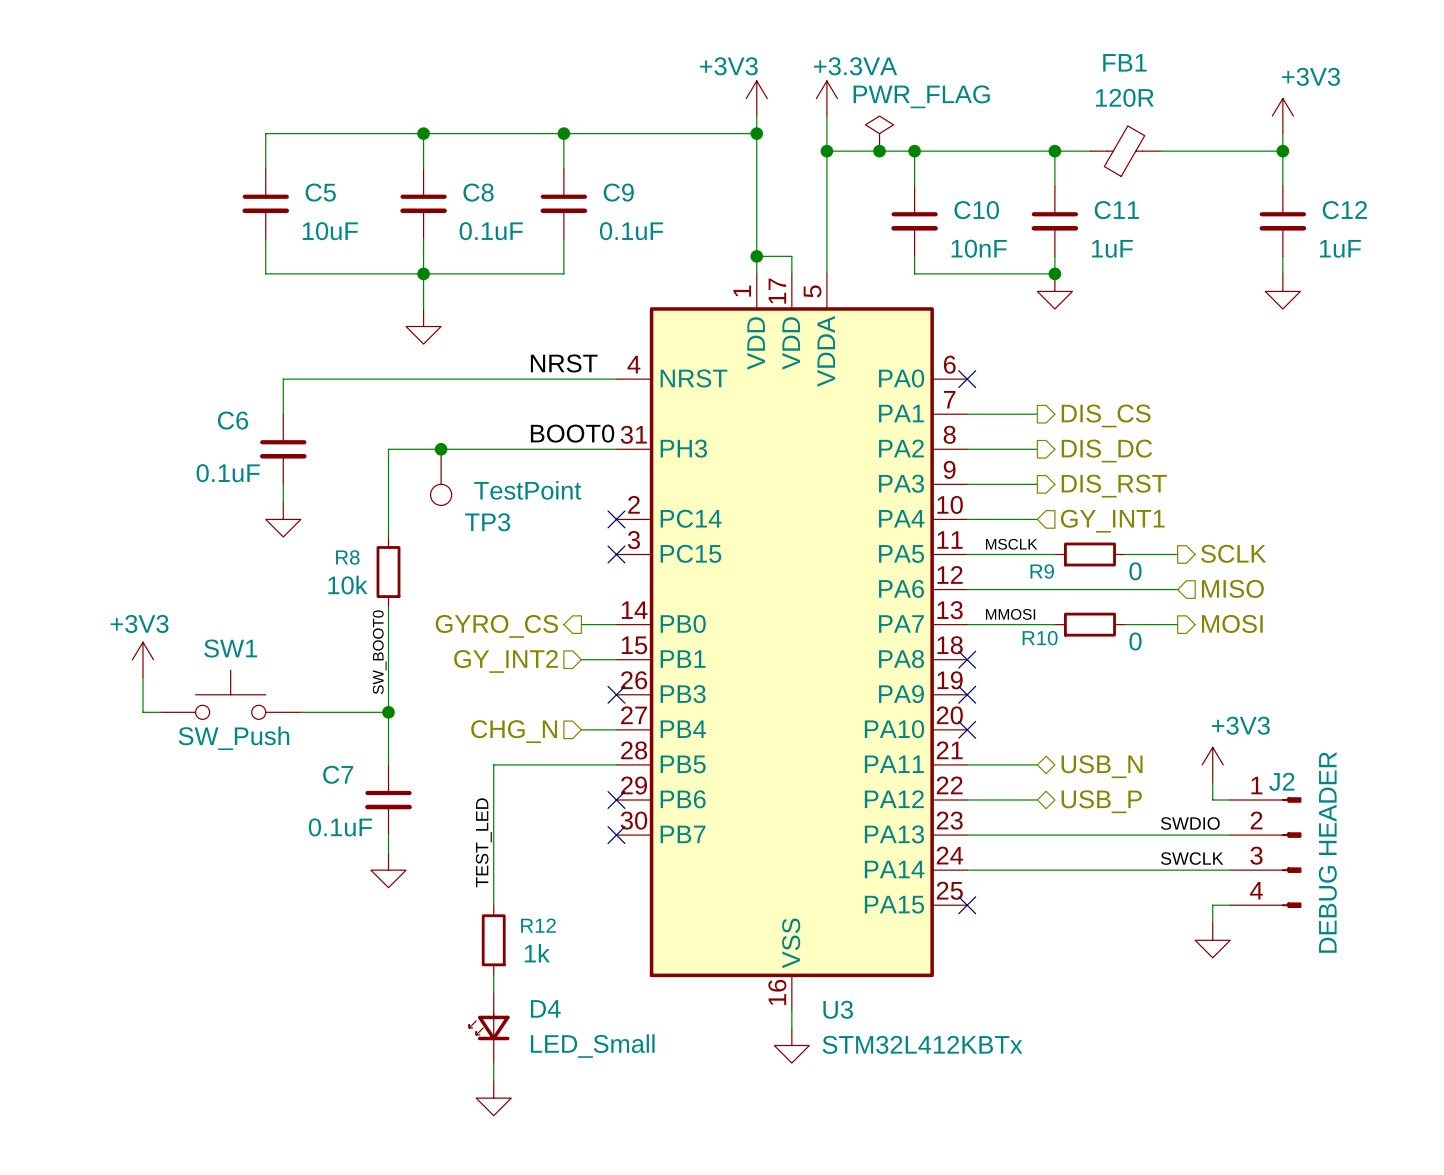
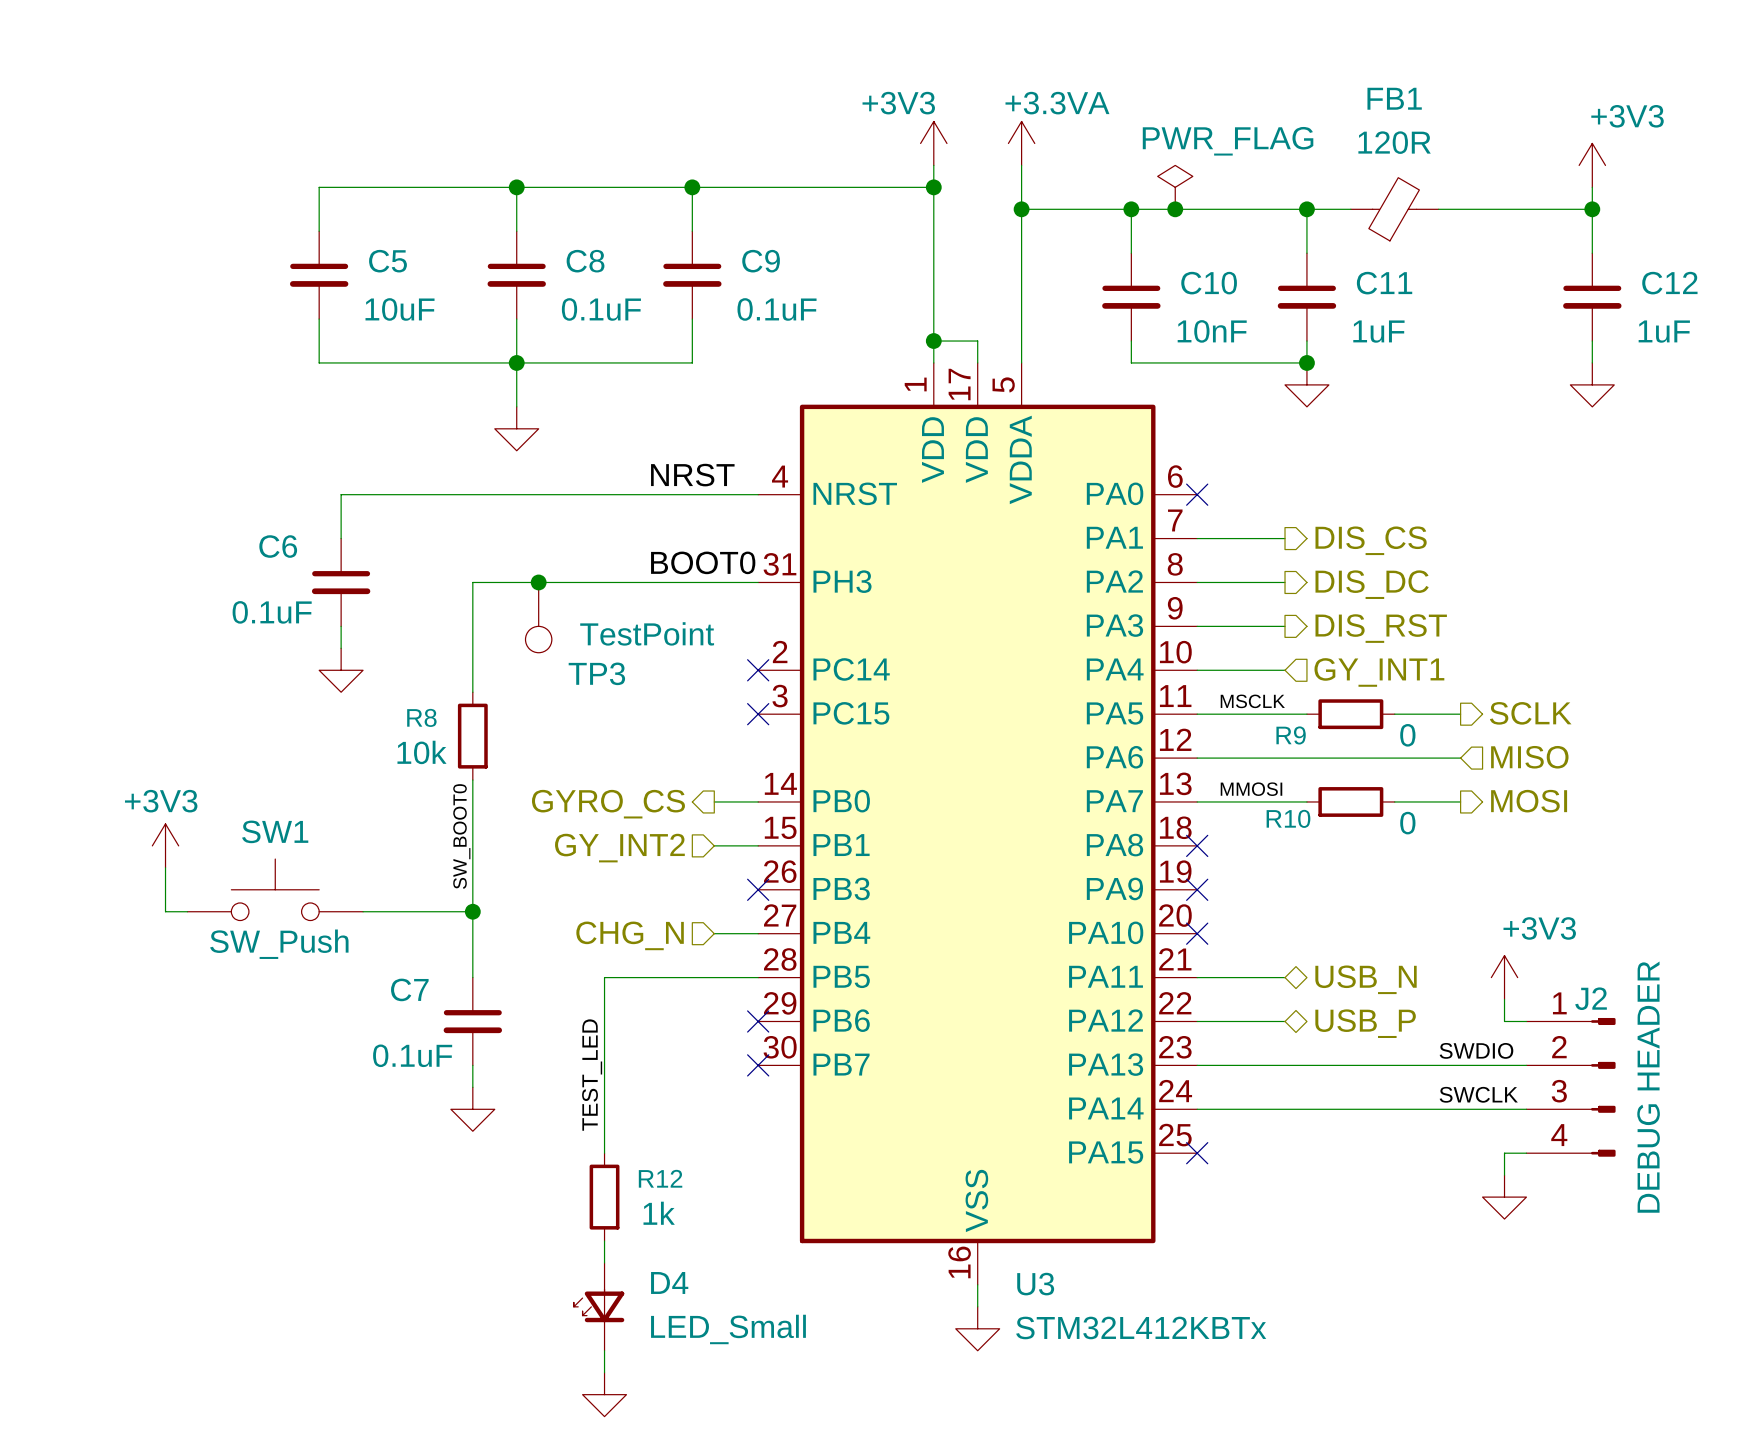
power symbol position: PWR_FLAG (879, 133) -> PWR_FLAG (1175, 187)
junction position: (879, 151) -> (1175, 209)

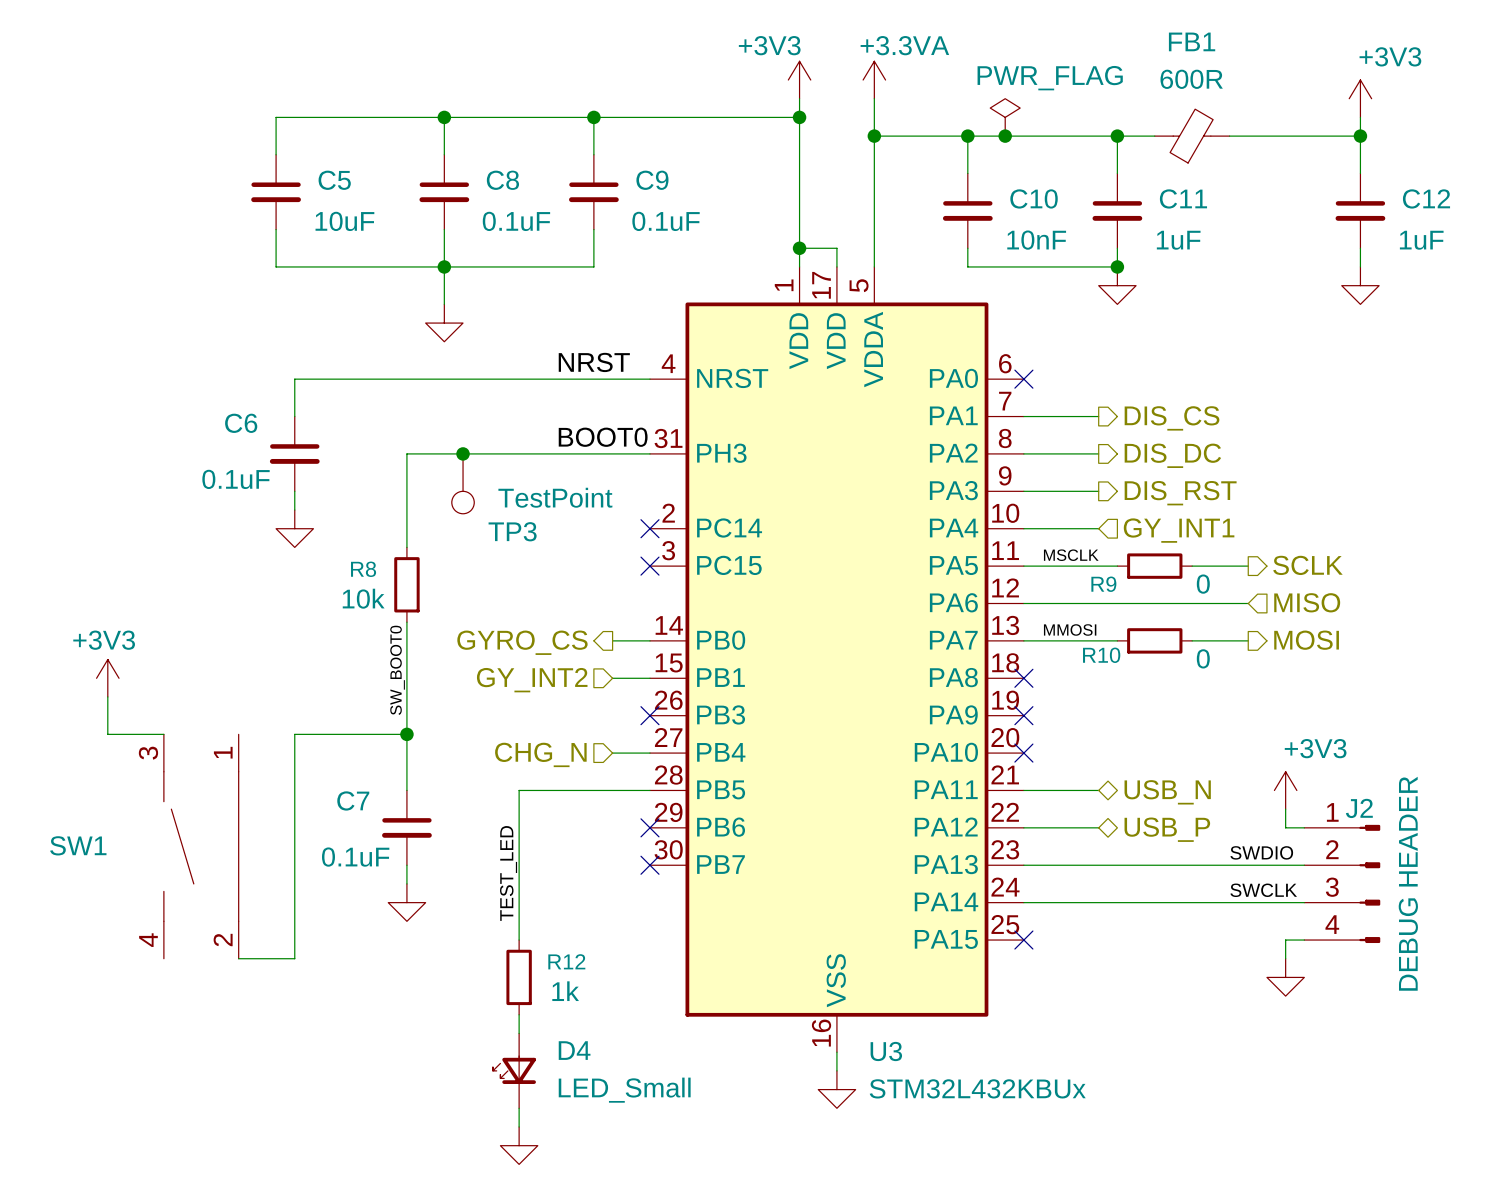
FB1 value: 120R (1394, 142) -> 600R (1191, 79)
SW1 name position: SW1 (275, 831) -> SW1 (78, 845)
power symbol position: +3V3 (165, 845) -> +3V3 (107, 678)
SW1 symbol: [187, 859, 364, 921] -> [163, 734, 239, 959]
wire: (165, 867) (165, 911) -> (107, 696) (107, 734) (145, 734)
wire: none -> (313, 734) (294, 734) (294, 958) (238, 958)
SW1 value: SW_Push (279, 944) -> none
U3 value: STM32L412KBTx (1141, 1327) -> STM32L432KBUx (977, 1088)

